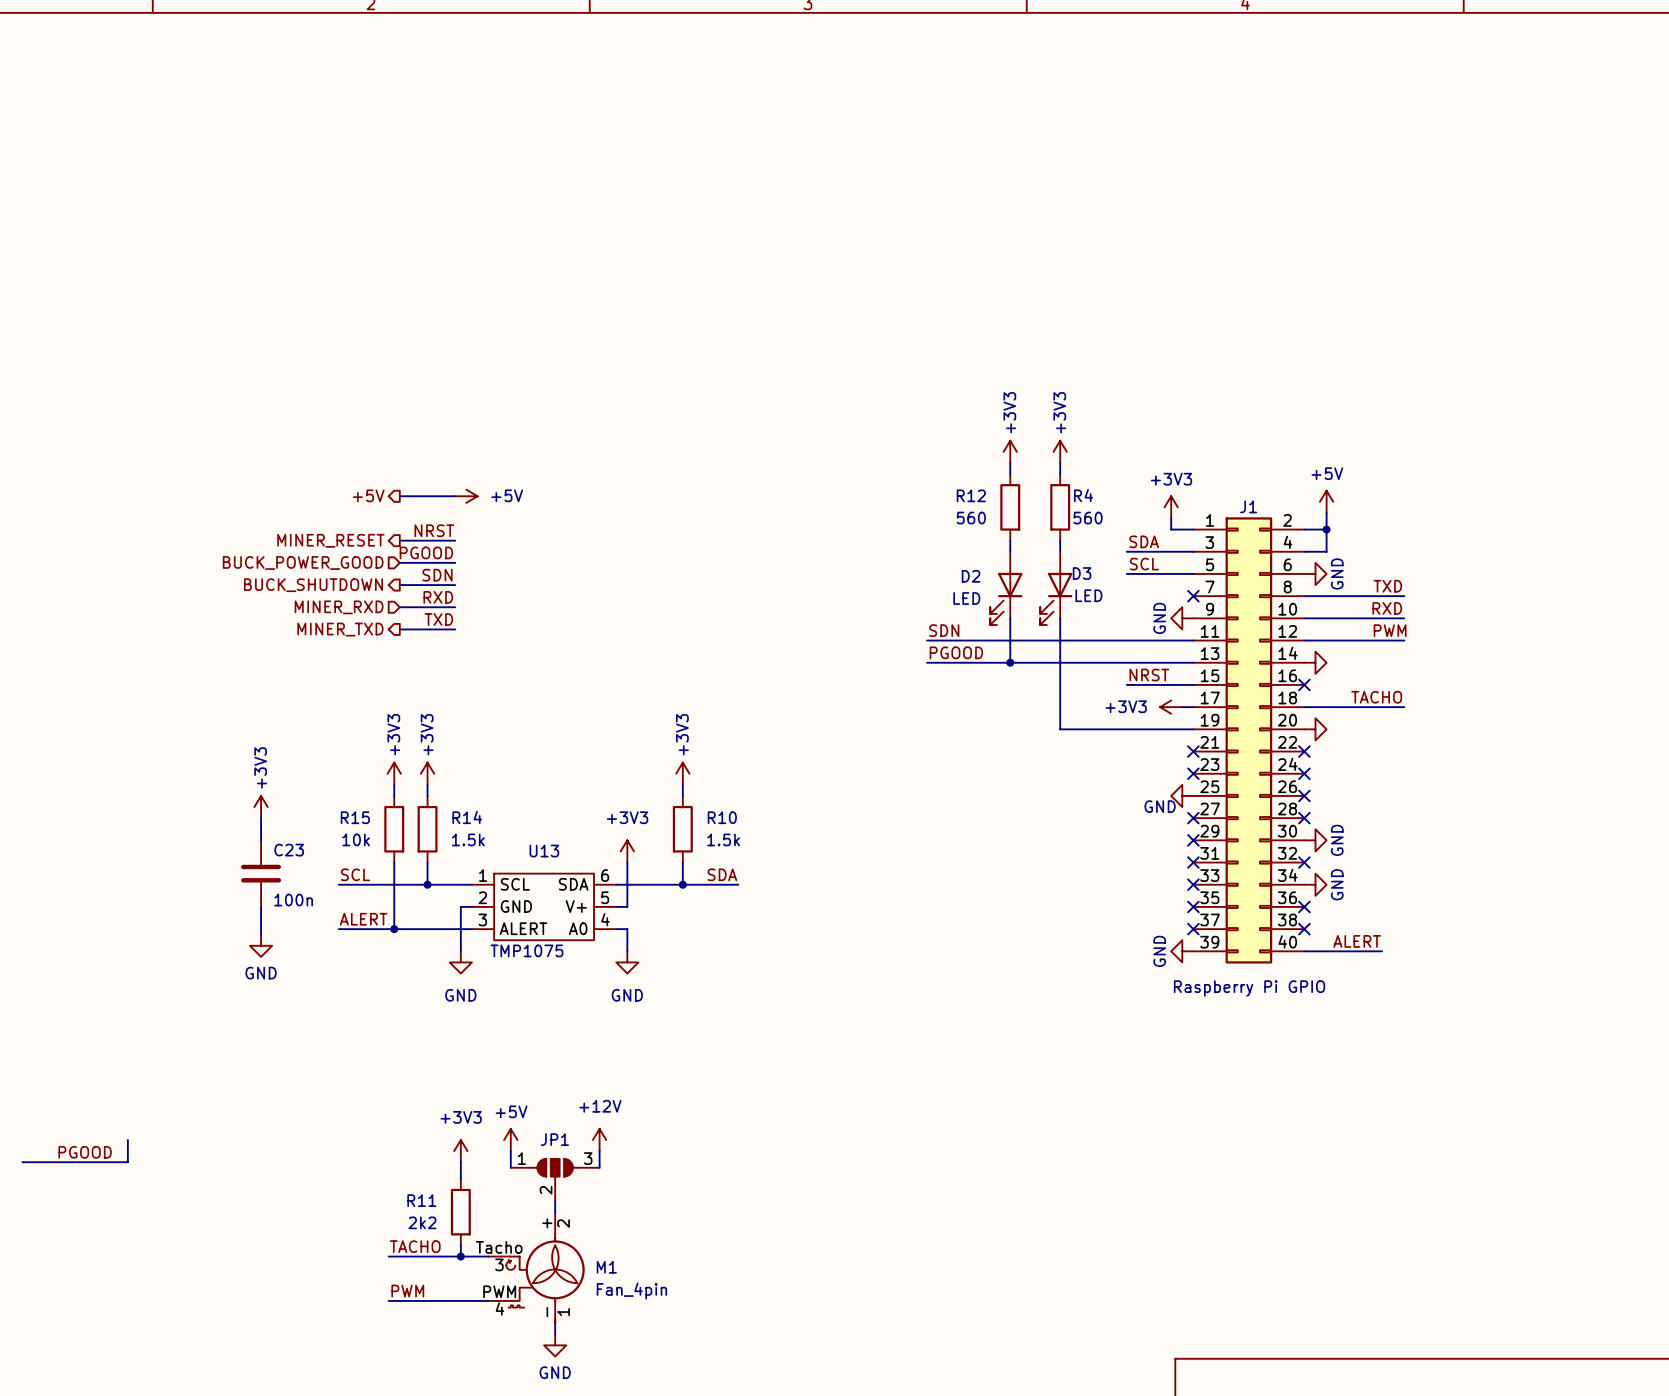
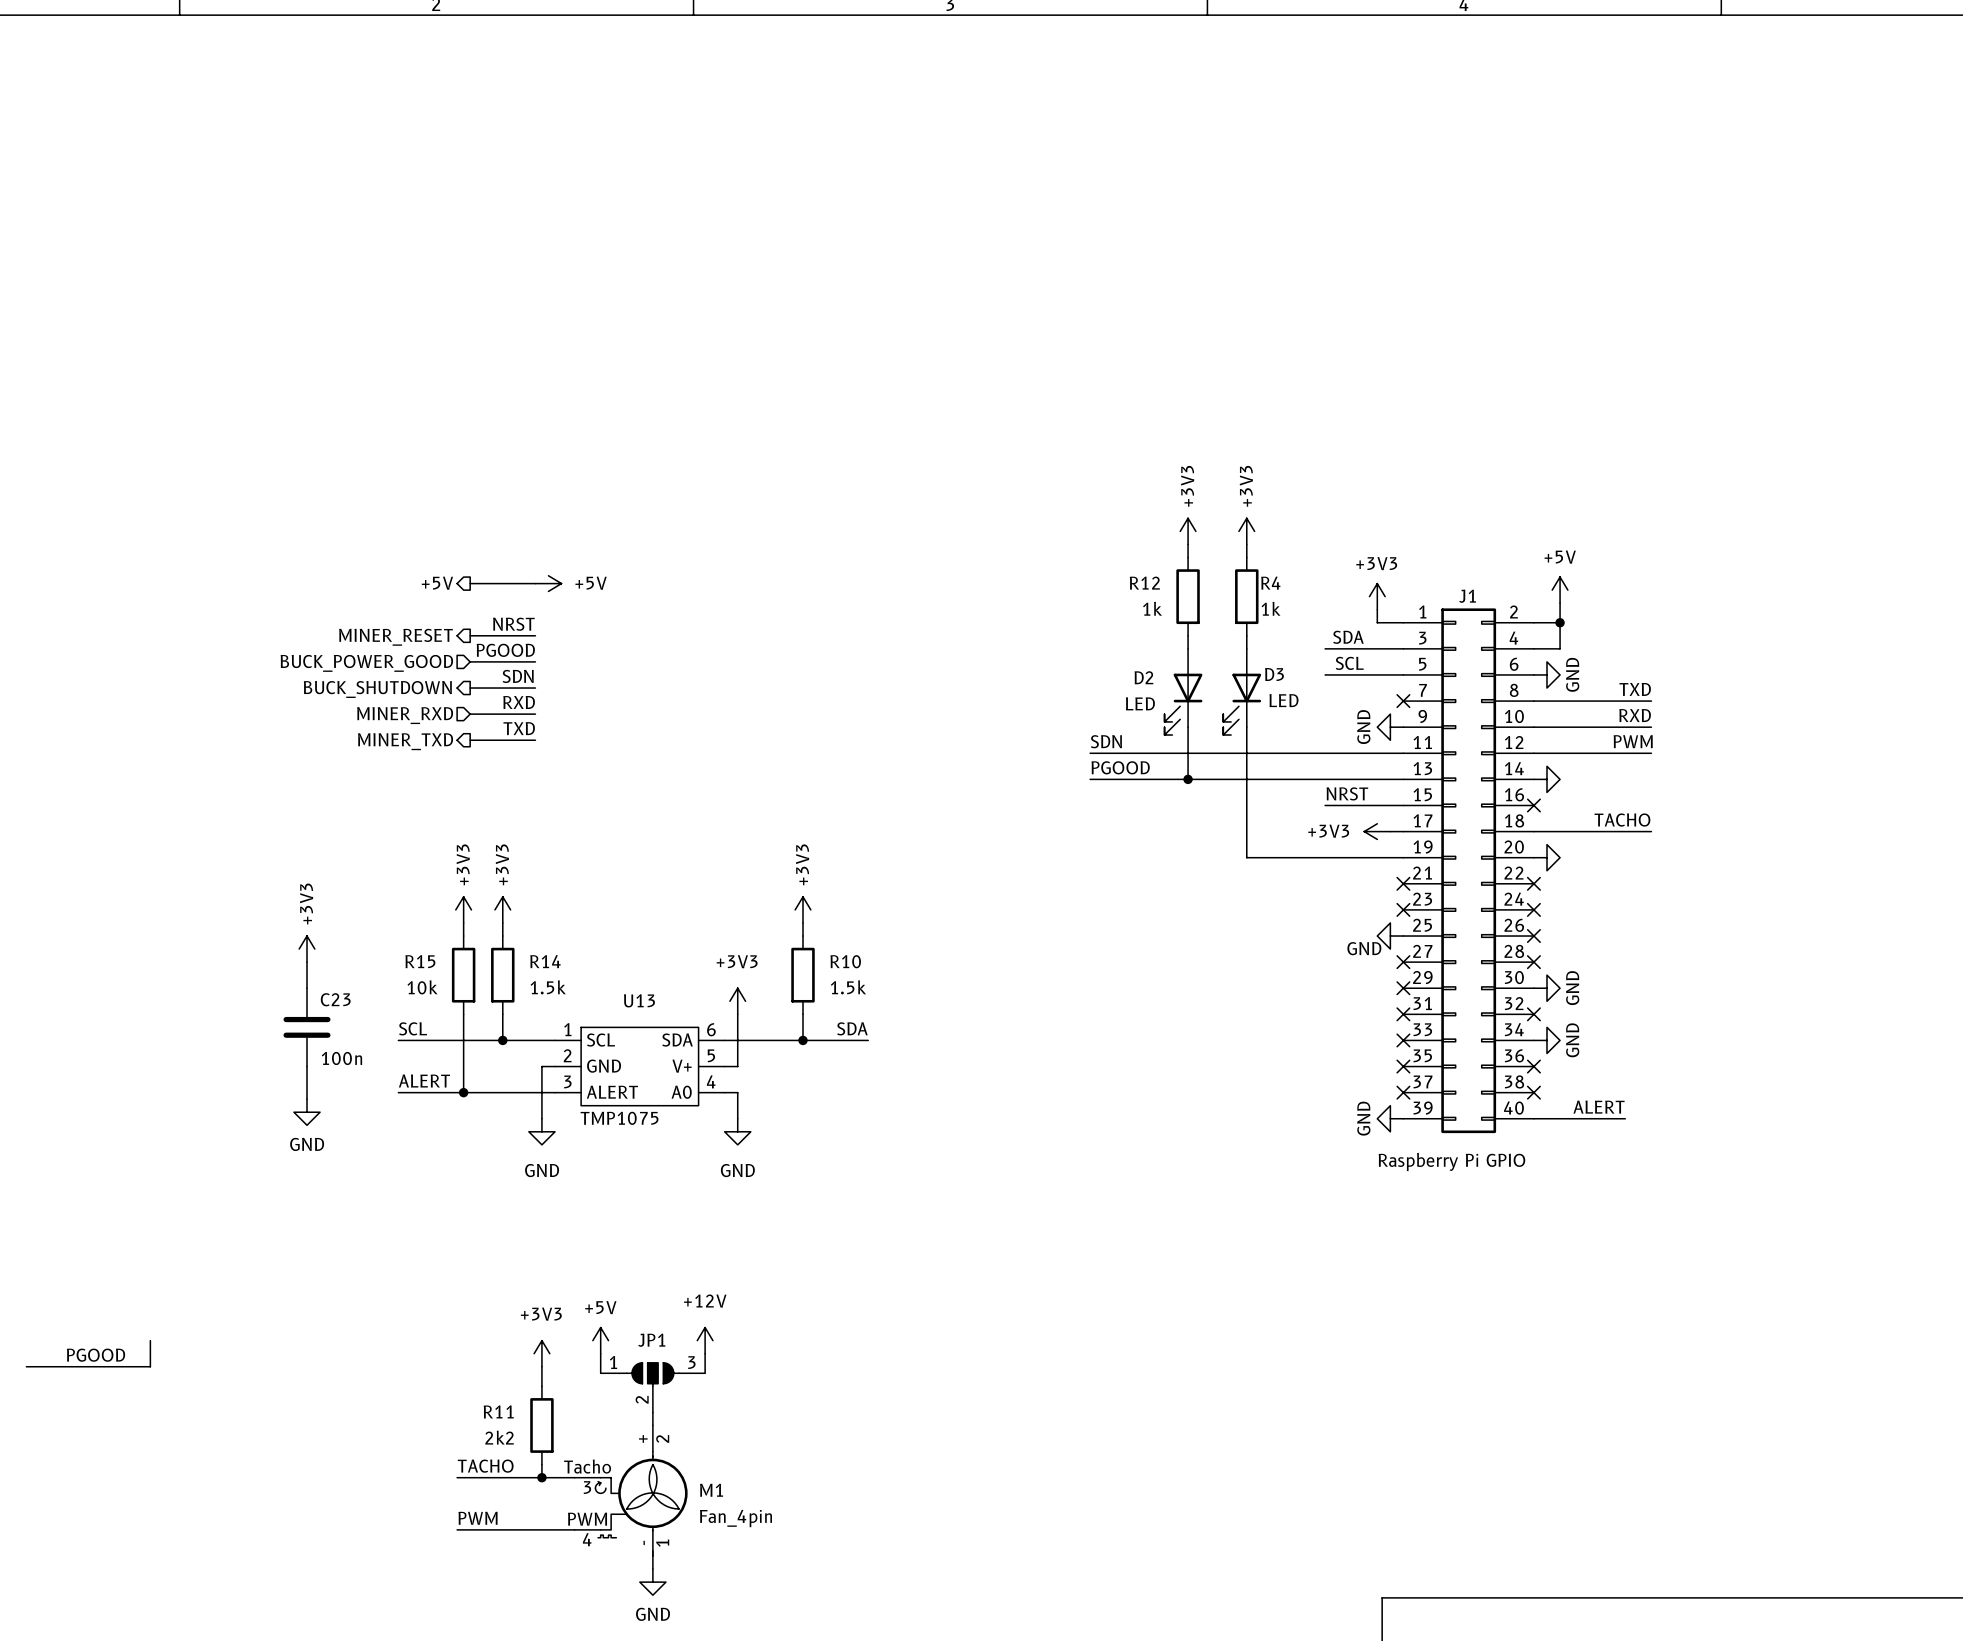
R12 value: 560 (971, 518) -> 1k (1152, 608)
R4 value: 560 (1088, 518) -> 1k (1270, 608)

